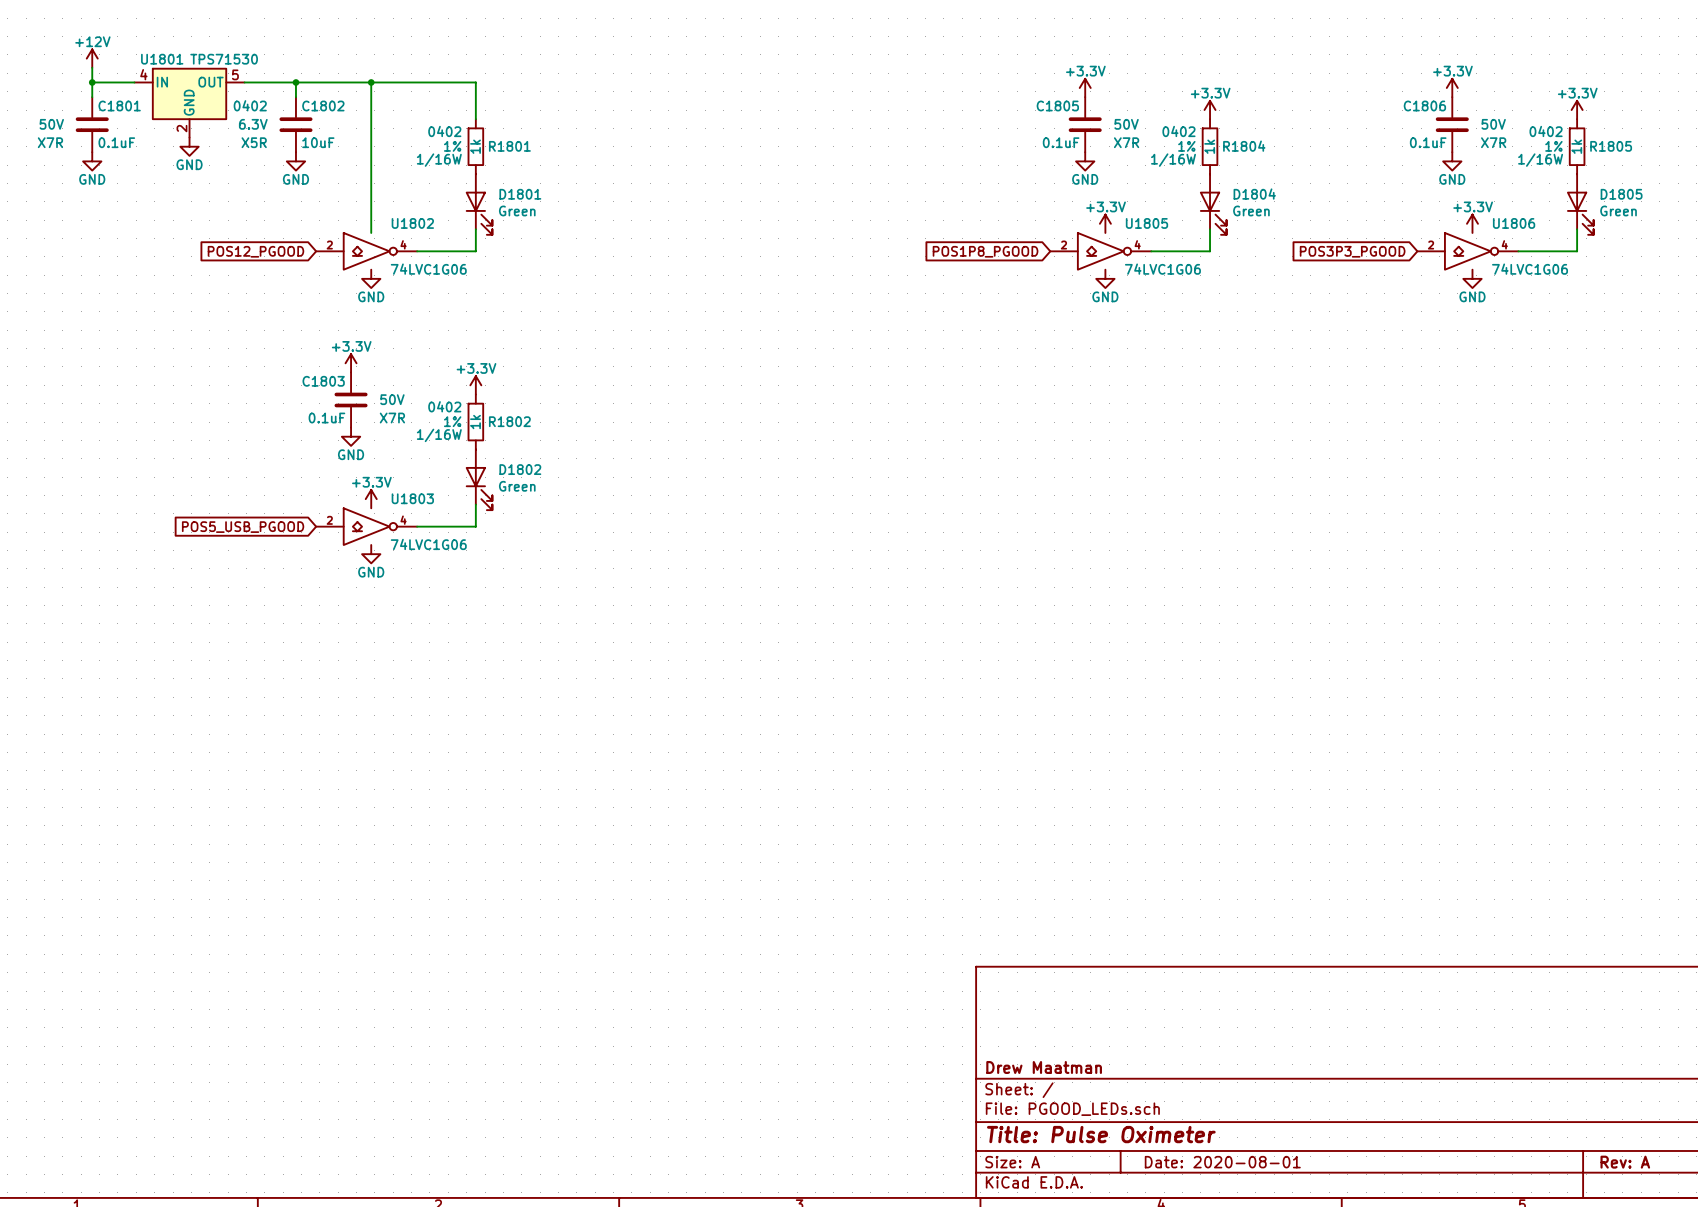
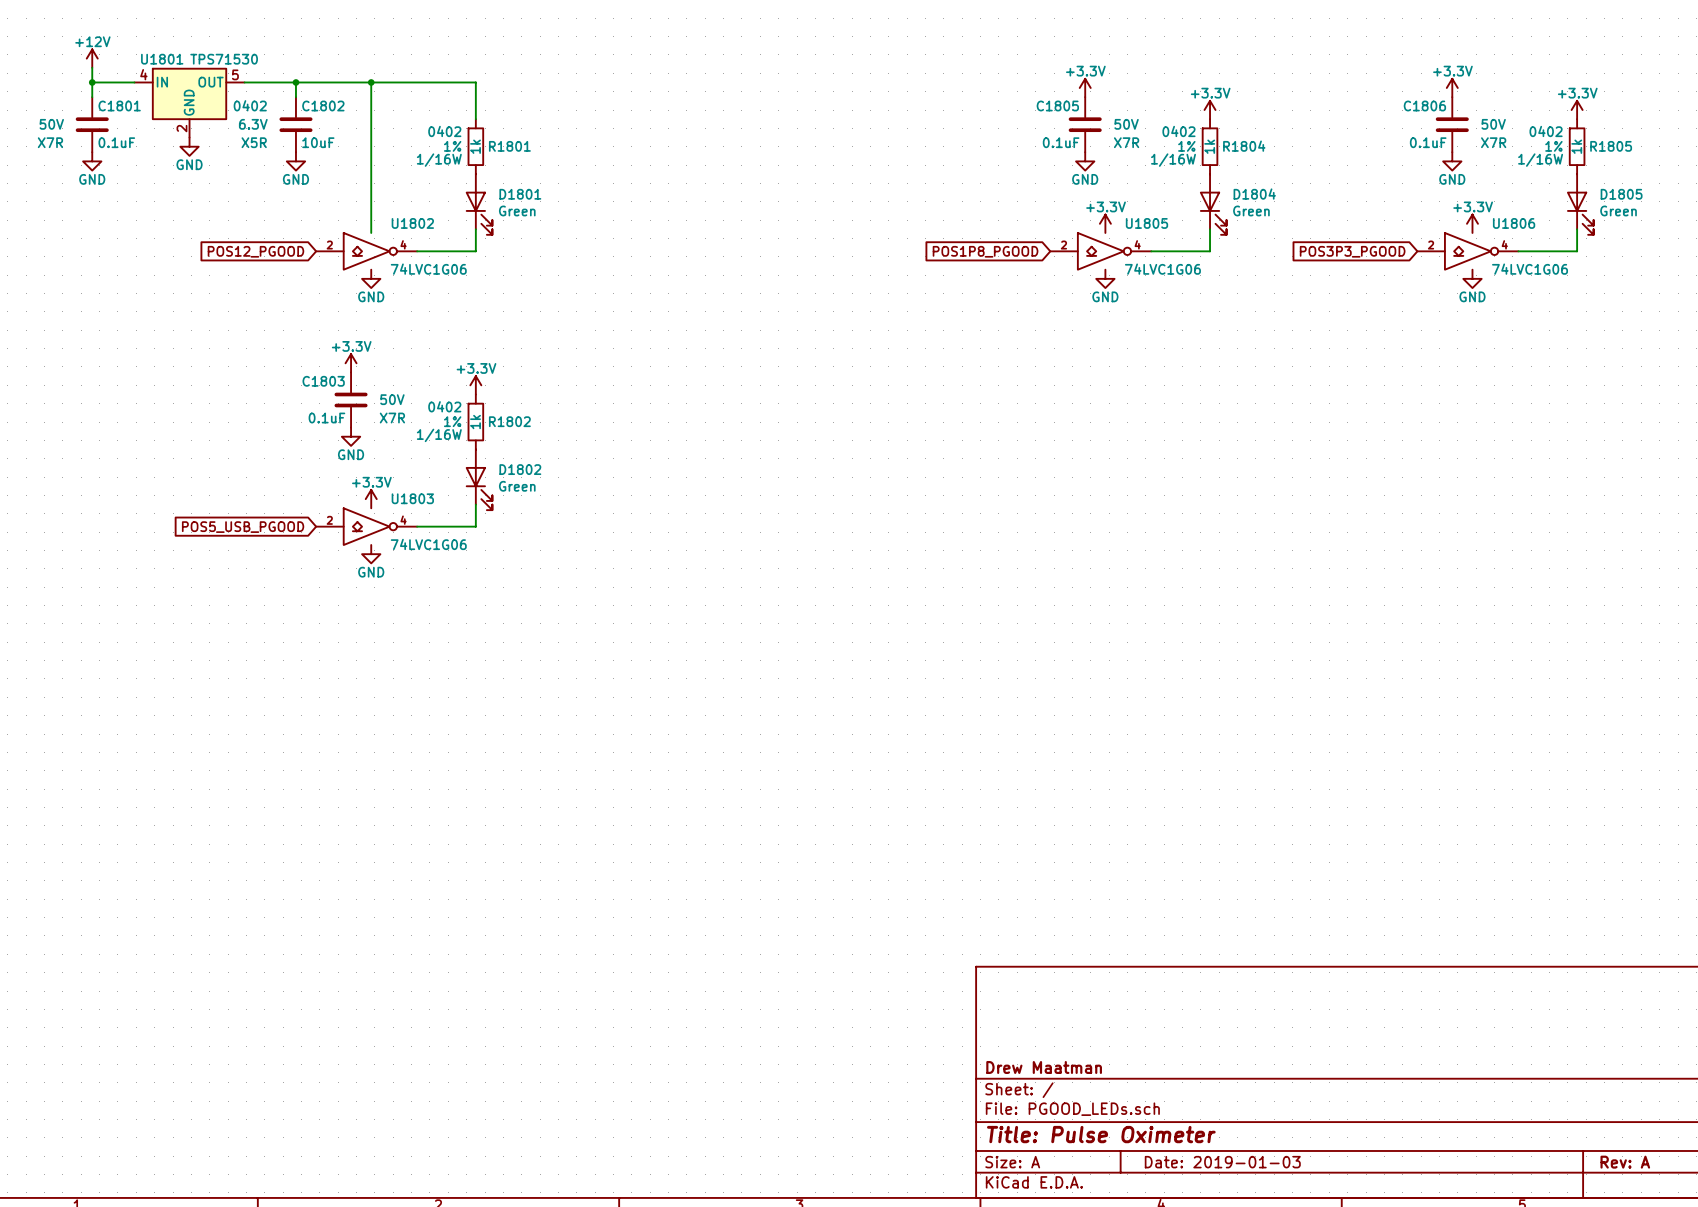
title block: Date: 2020-08-01 (1222, 1162) -> Date: 2019-01-03 (1222, 1162)

